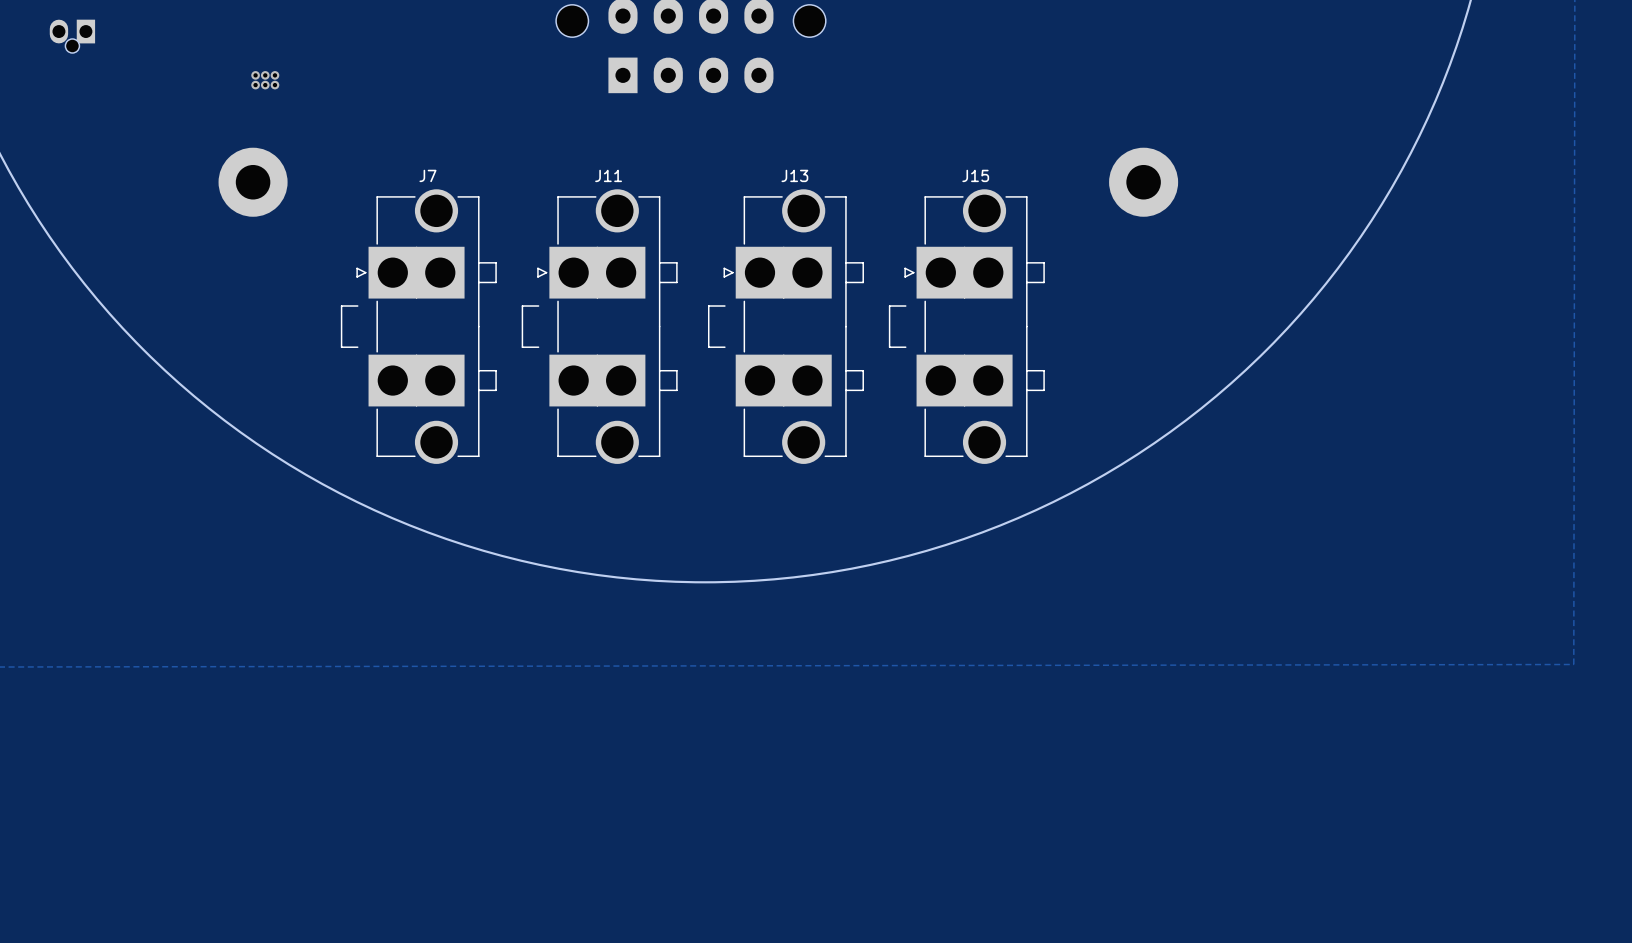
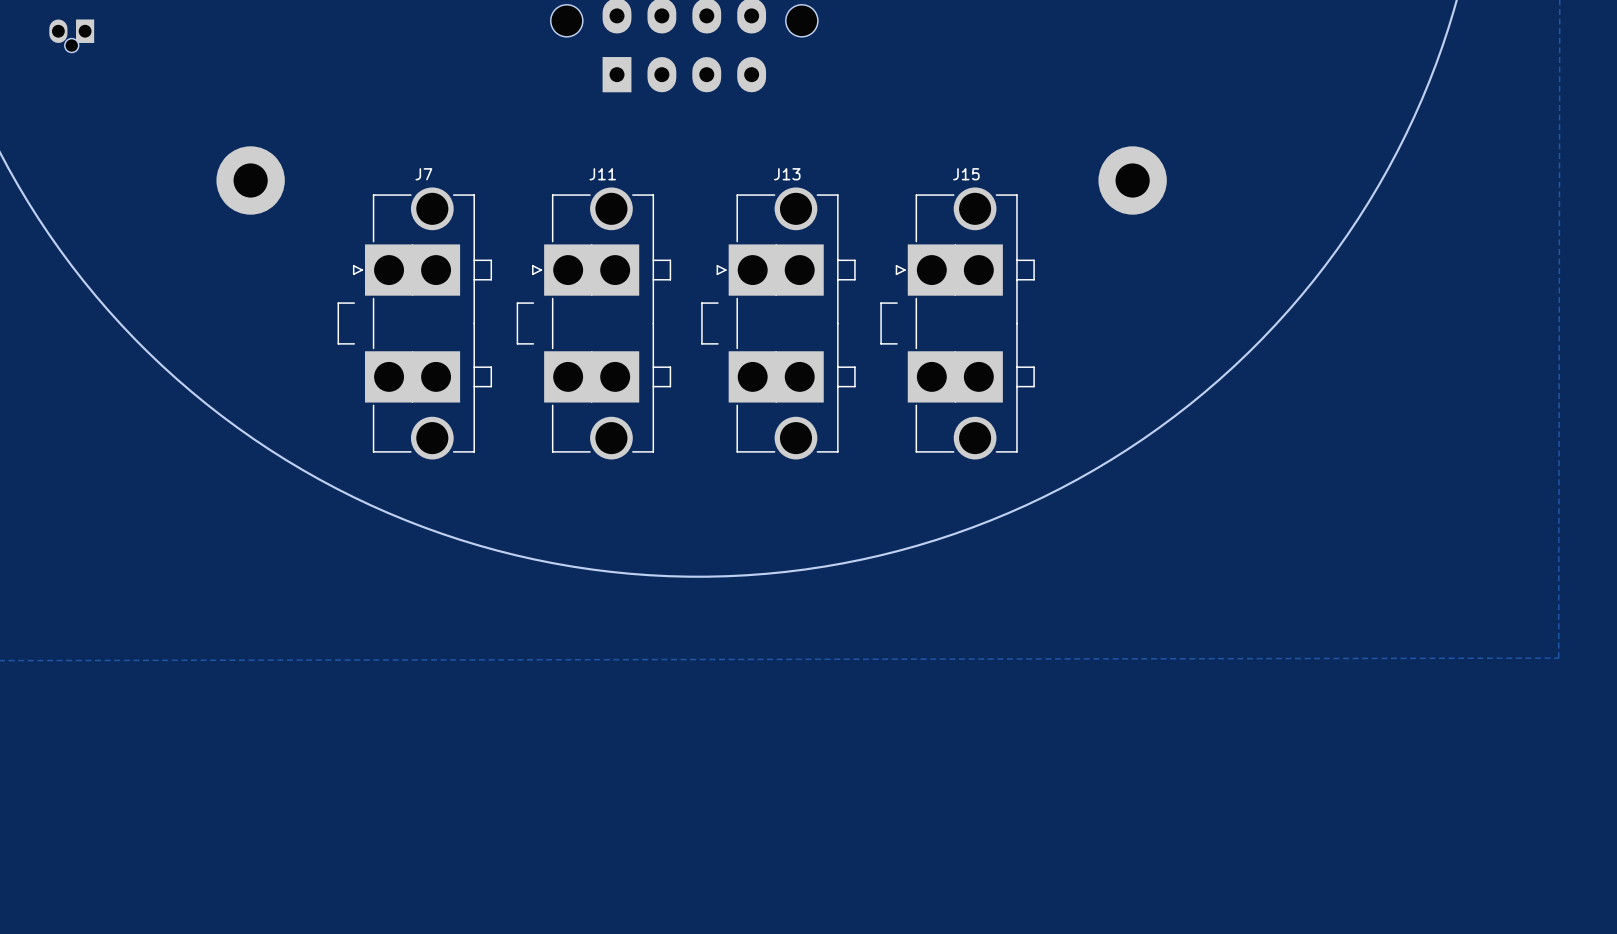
via: (255, 75) -> none
via: (265, 75) -> none
via: (274, 75) -> none
via: (255, 85) -> none
via: (265, 85) -> none
via: (274, 85) -> none

